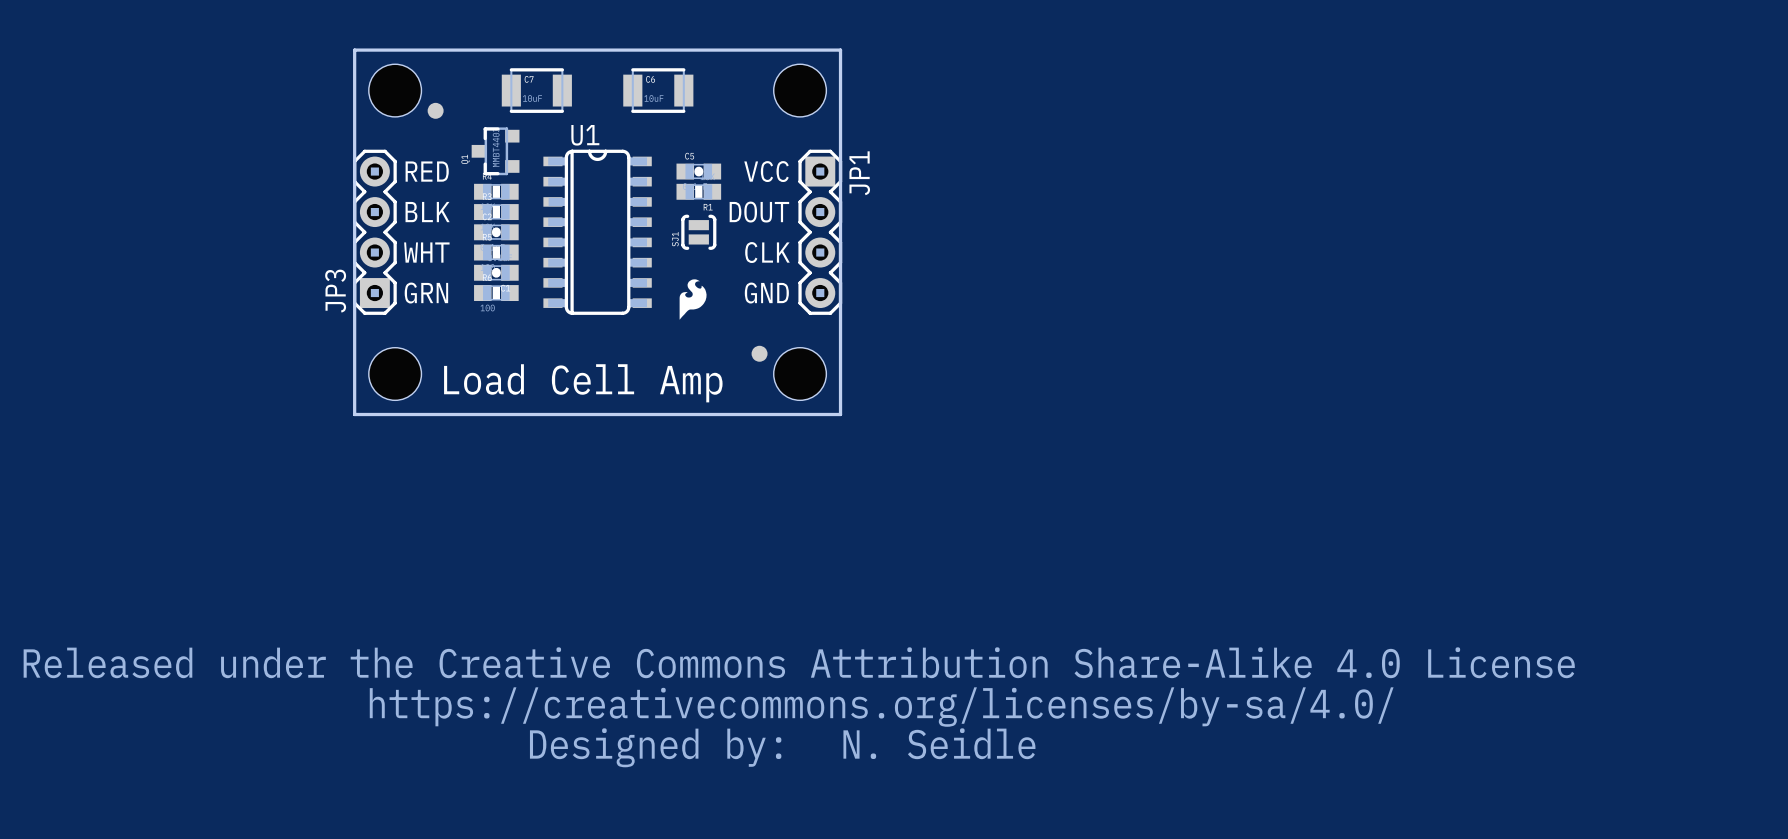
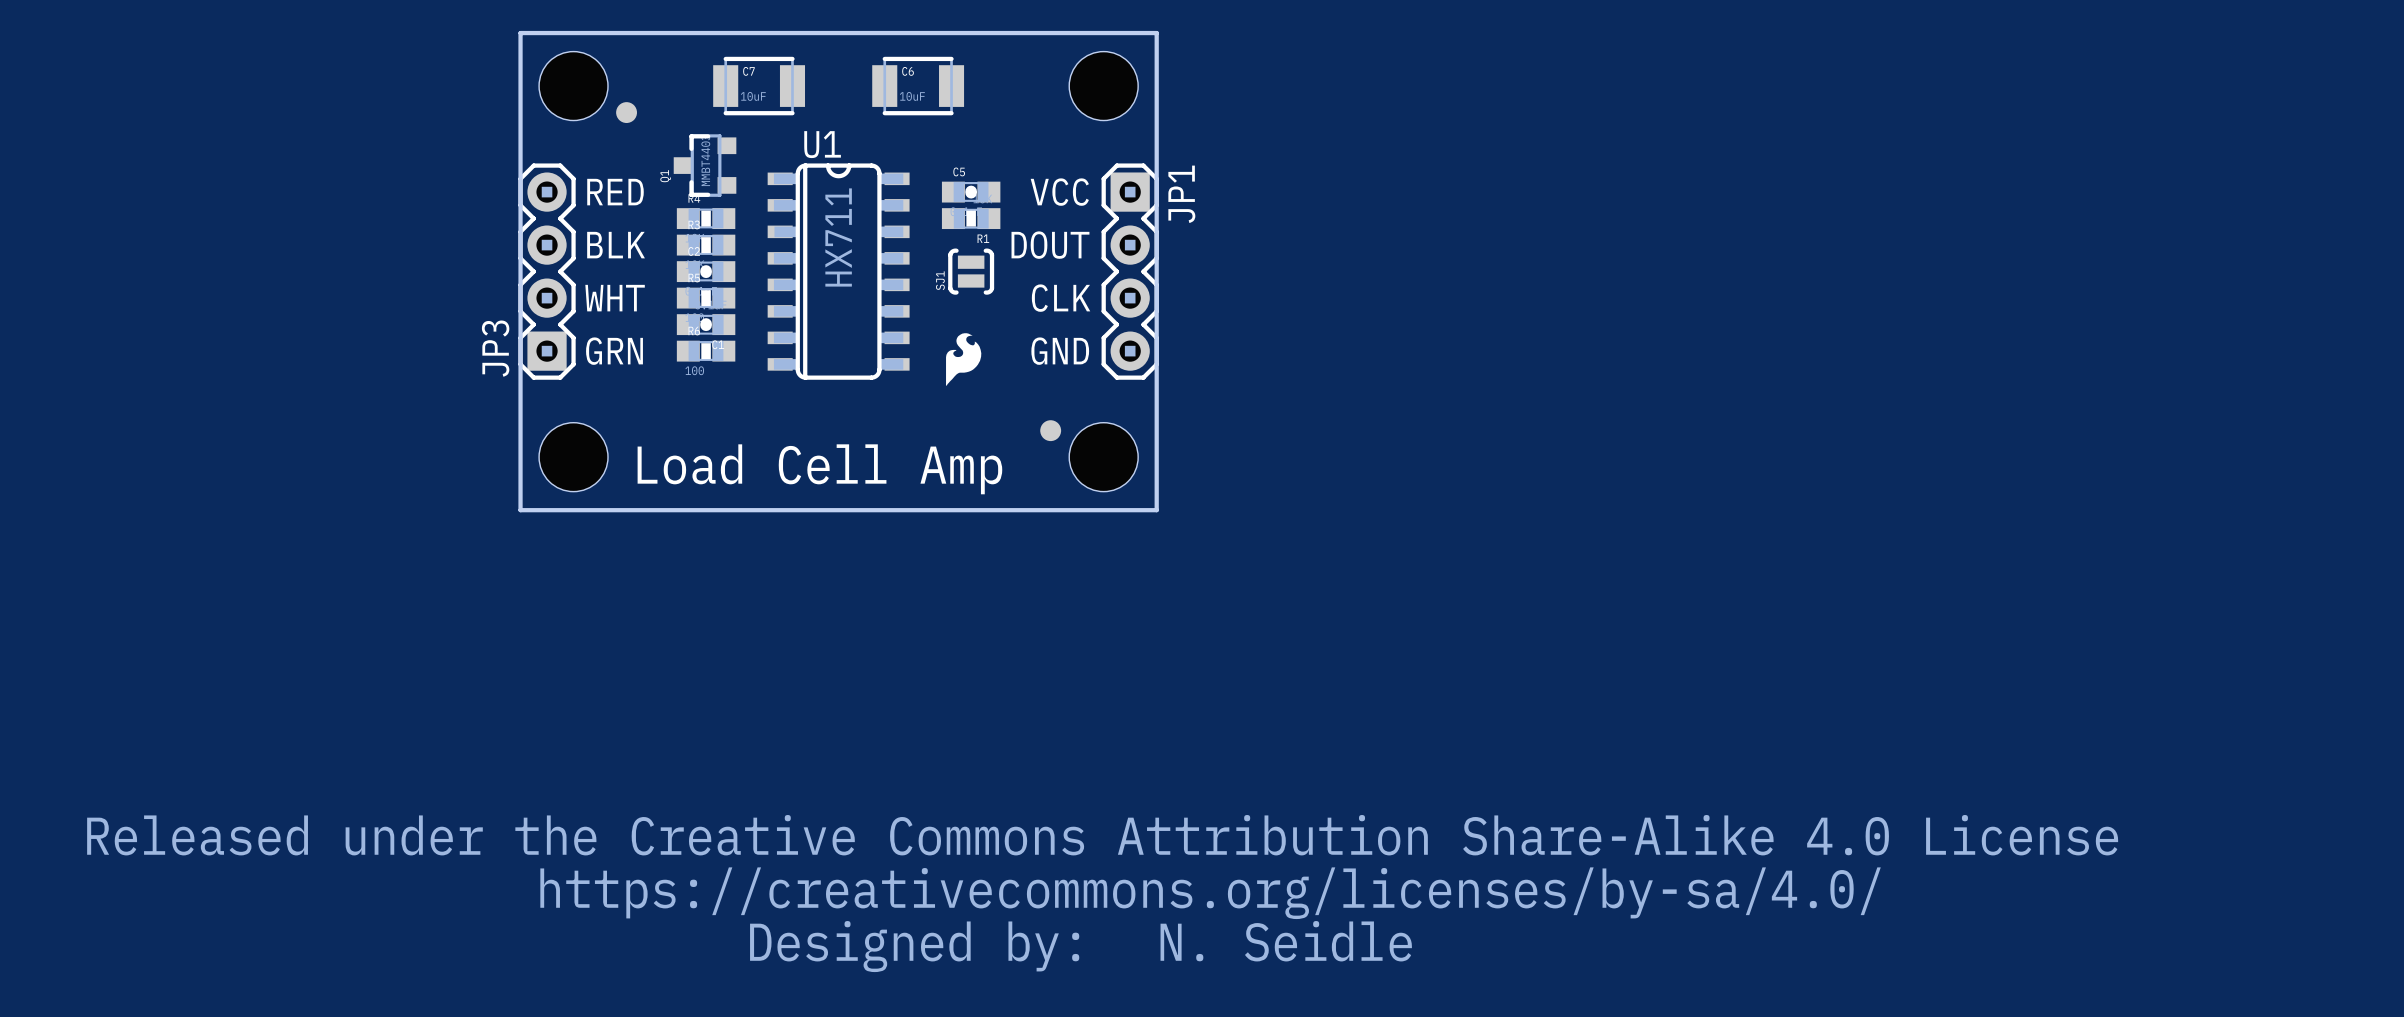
U1 value: none -> HX711 (838, 237)

